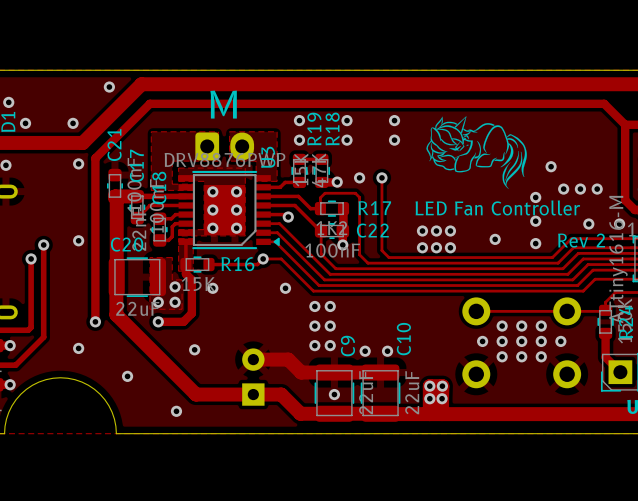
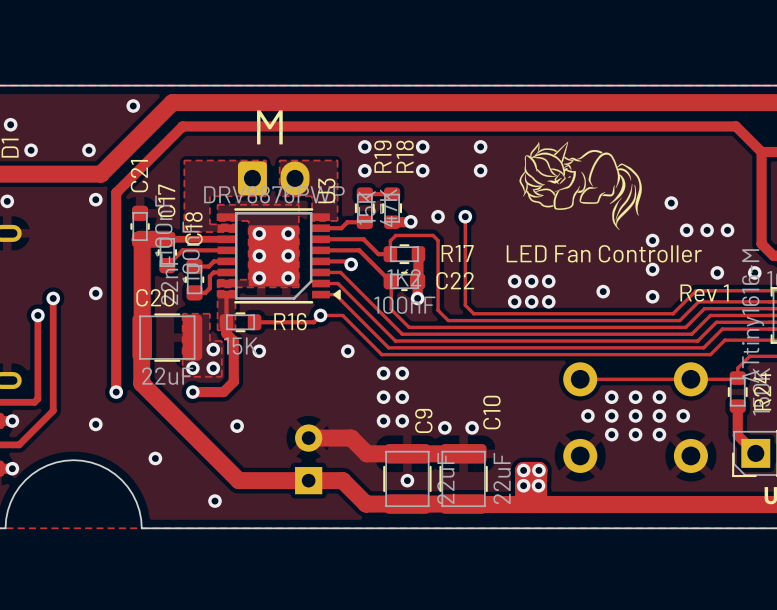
text: Rev 2 (581, 240) -> Rev 1 (704, 293)

